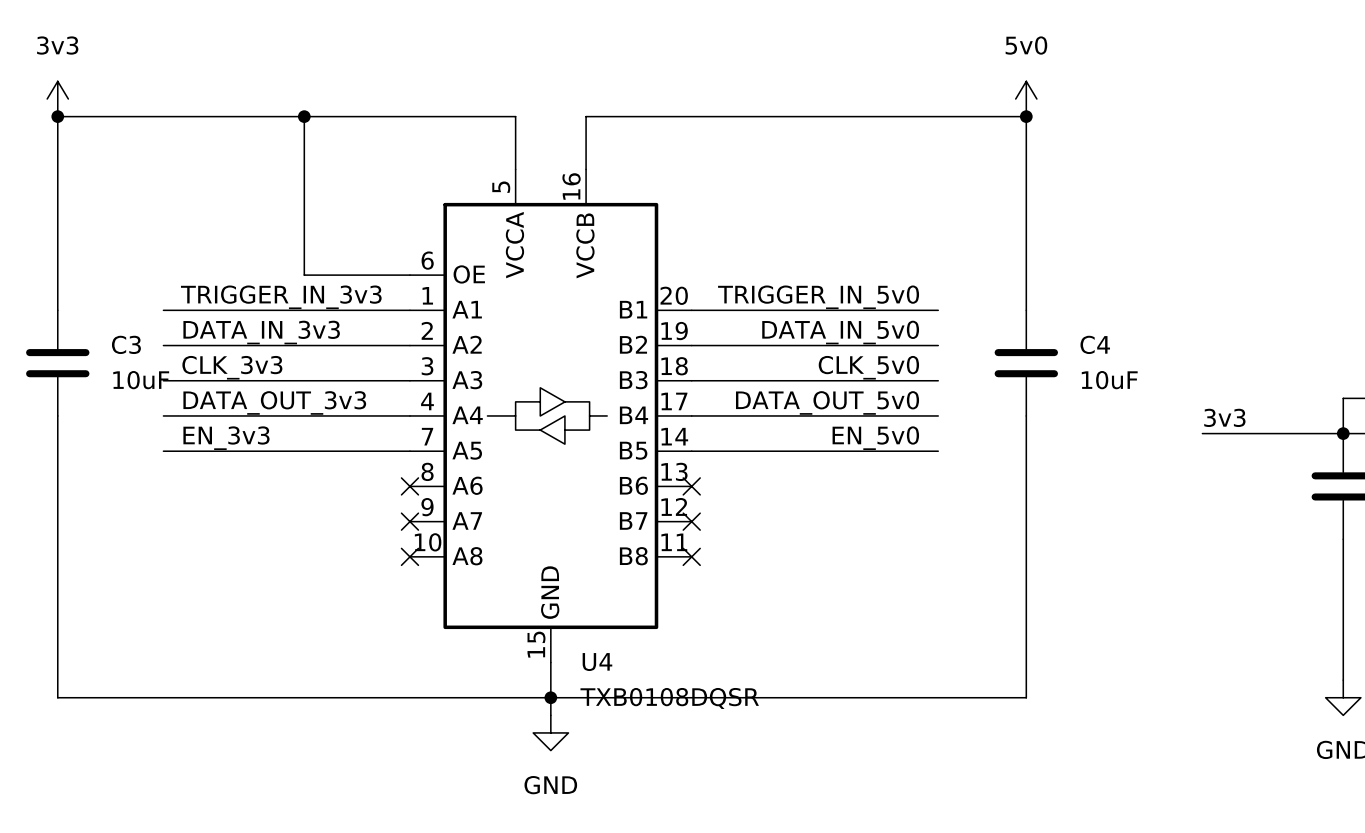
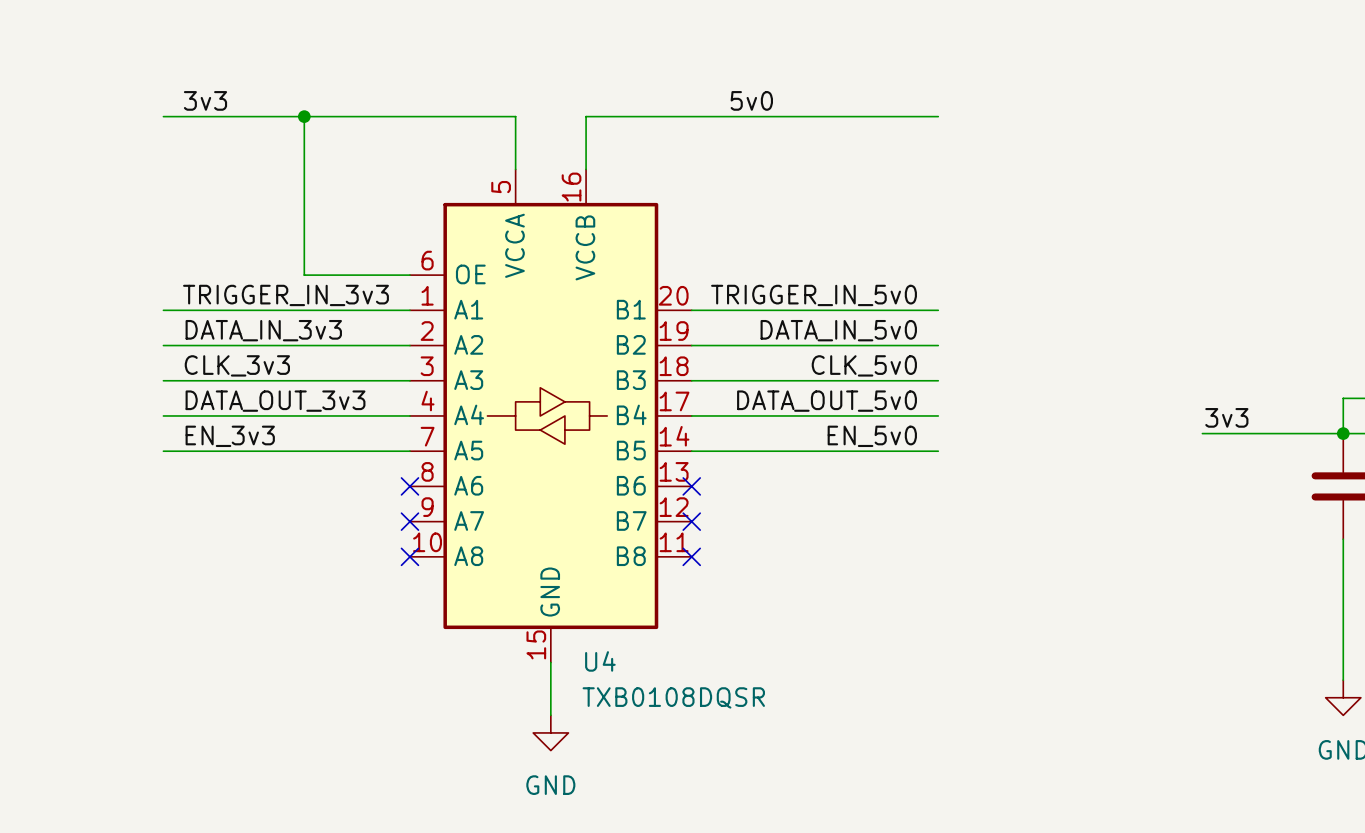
power symbol: 3v3 (57, 99) -> none
power symbol: 5v0 (1026, 99) -> none
label: none -> 3v3 (205, 100)
label: none -> 5v0 (751, 100)
junction: (57, 116) -> none
wire: (163, 116) (57, 116) (57, 310) -> none
wire: (938, 116) (1026, 116) (1026, 310) -> none
junction: (1026, 116) -> none
C3: 10uF (57, 363) -> none
C4: 10uF (1026, 363) -> none
wire: (57, 415) (57, 697) (1026, 697) (1026, 415) -> none
junction: (550, 697) -> none

